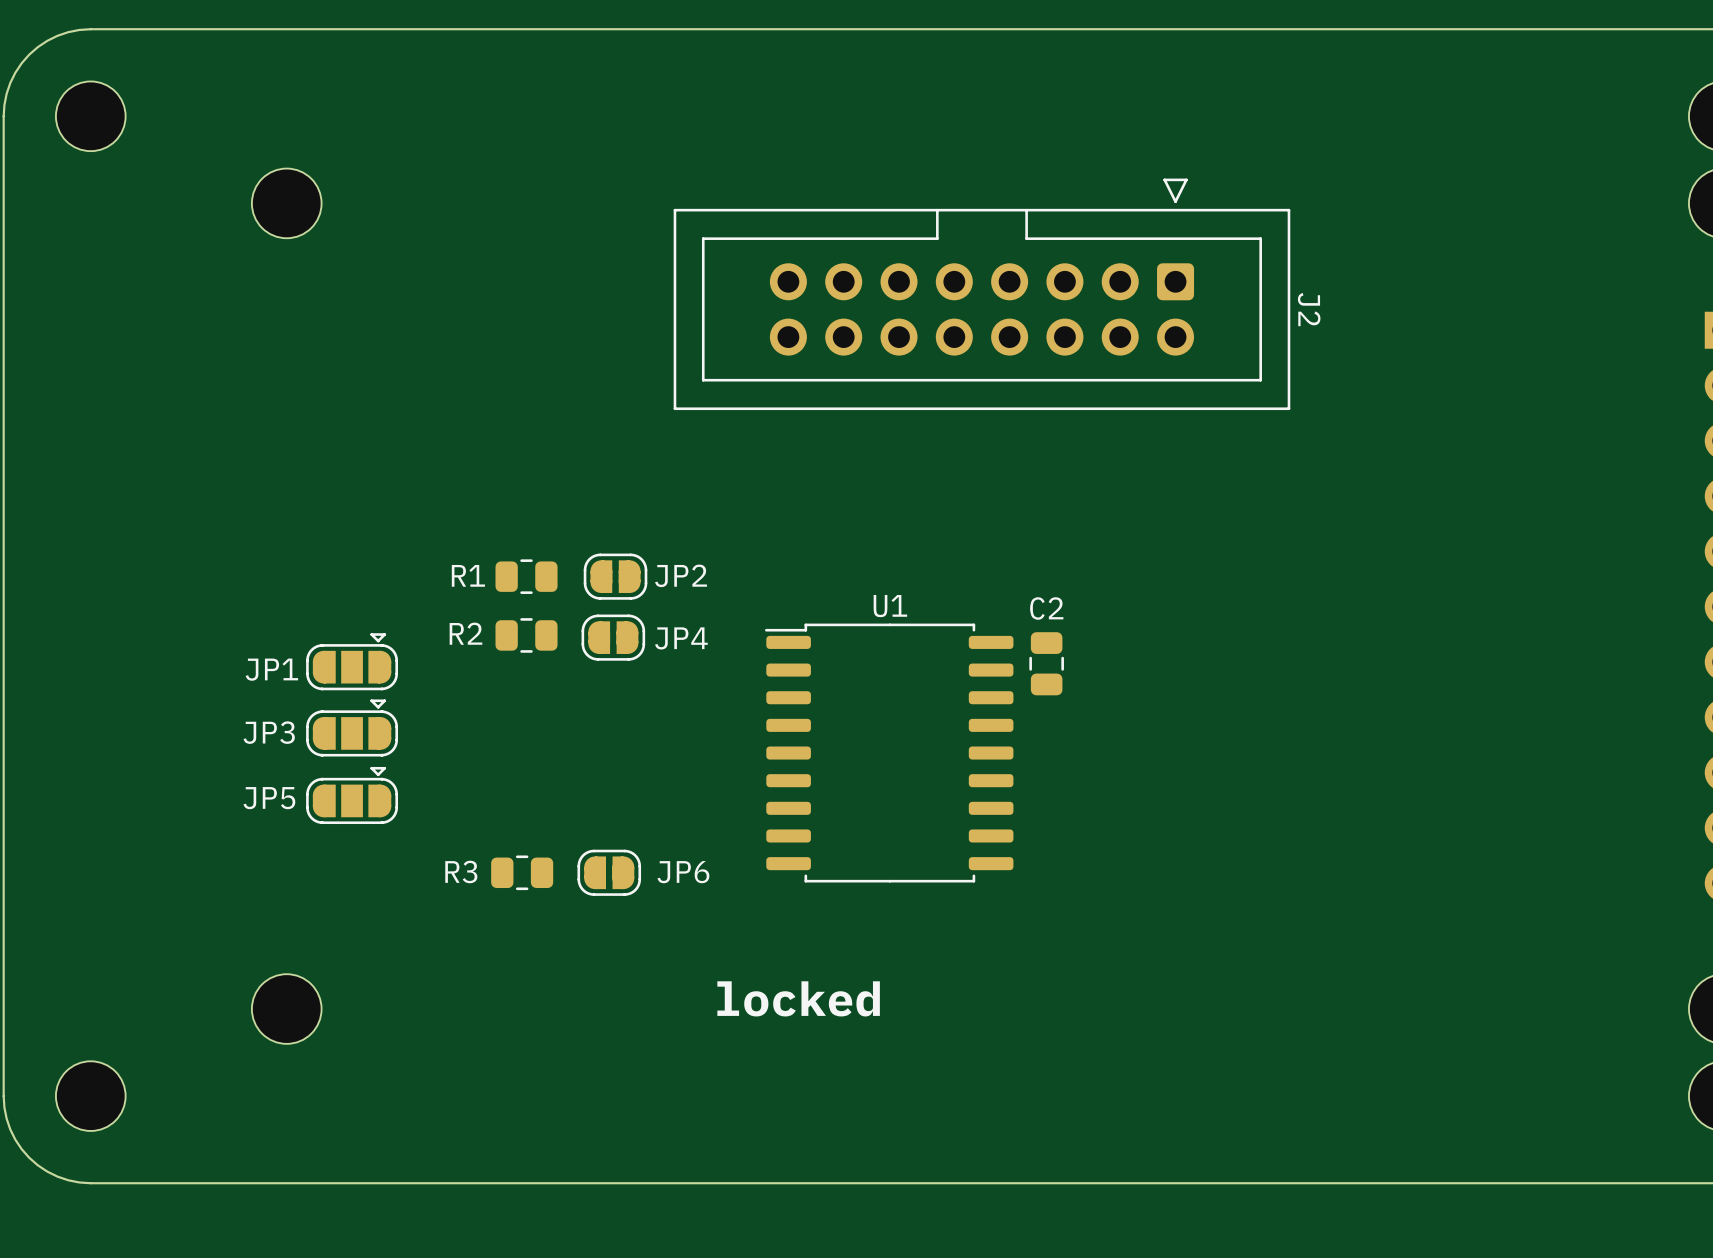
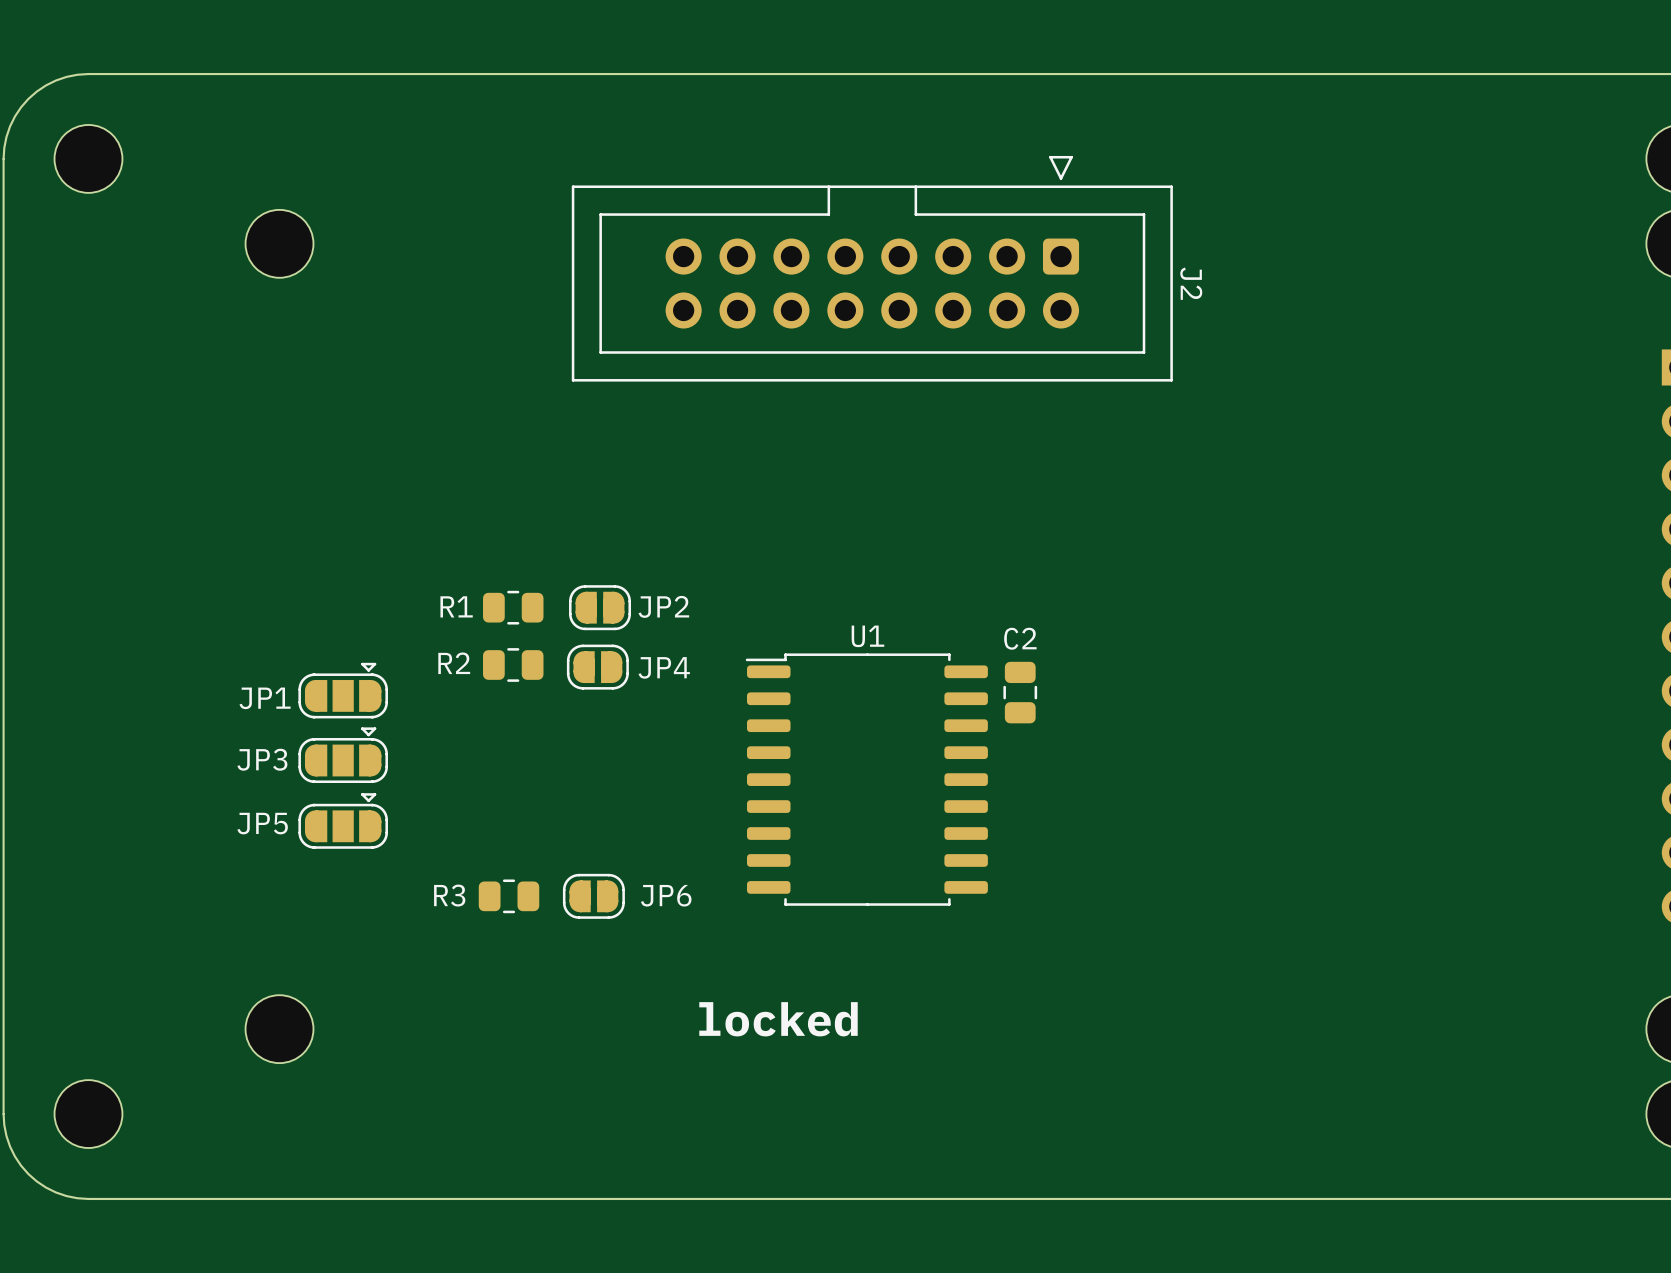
J2 position: (981, 294) -> (872, 268)

